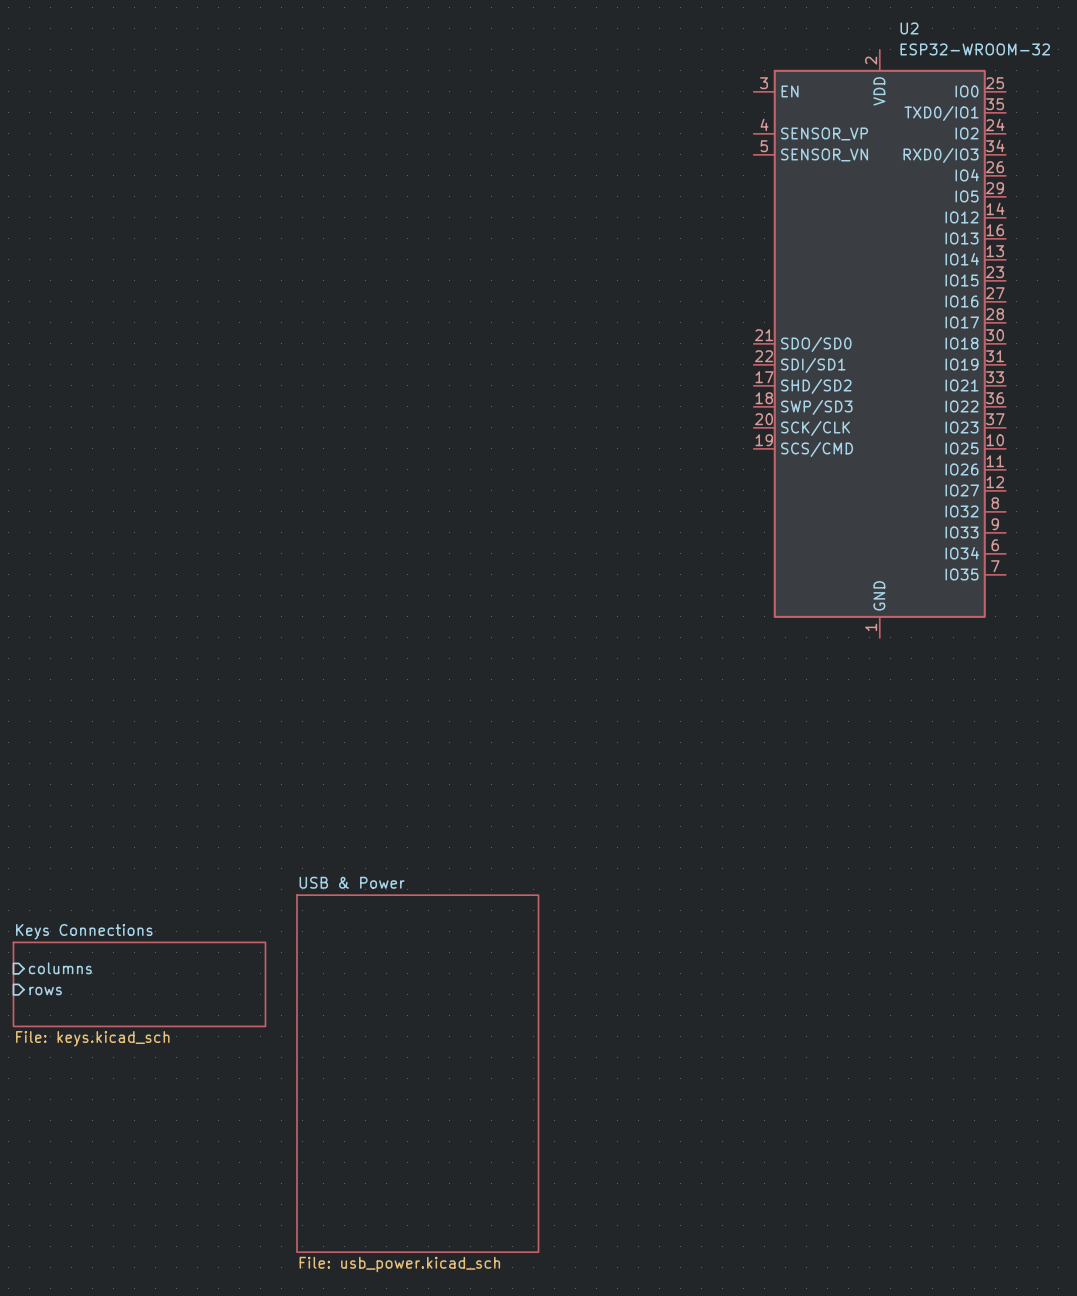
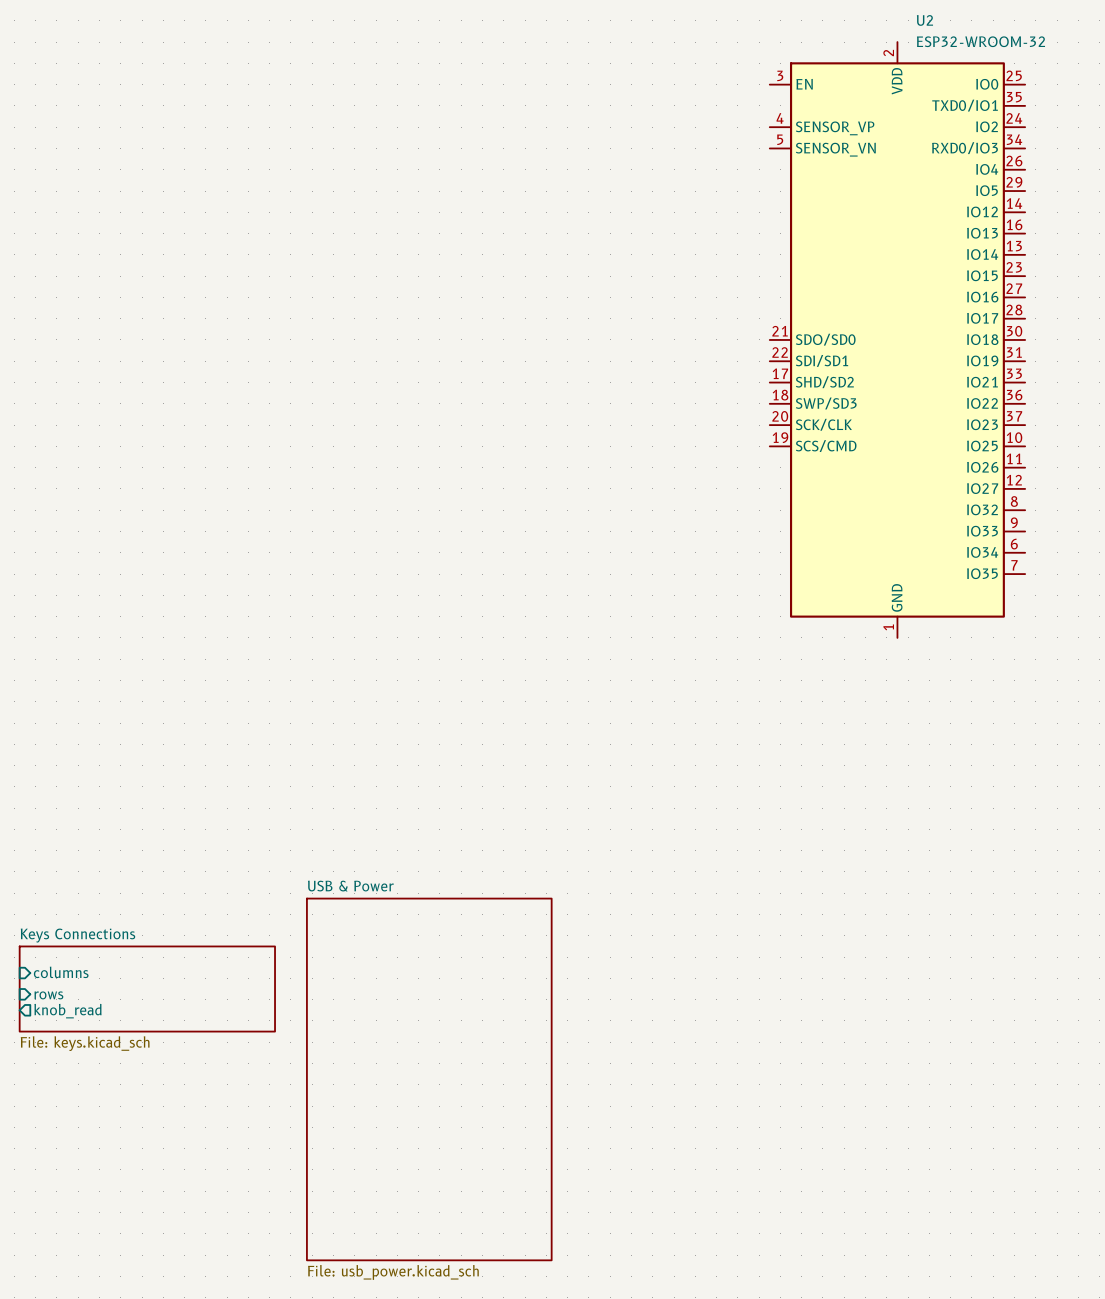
sheet pin: none -> knob_read (68, 1011)

